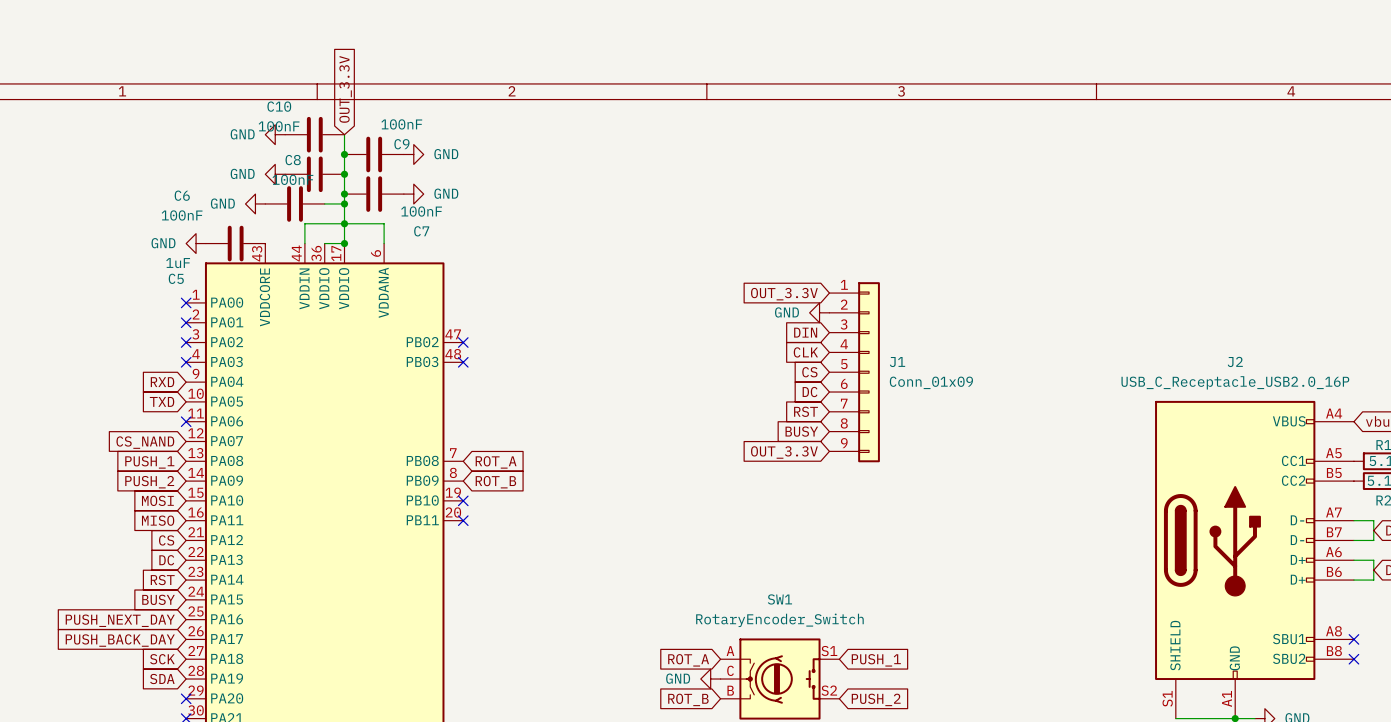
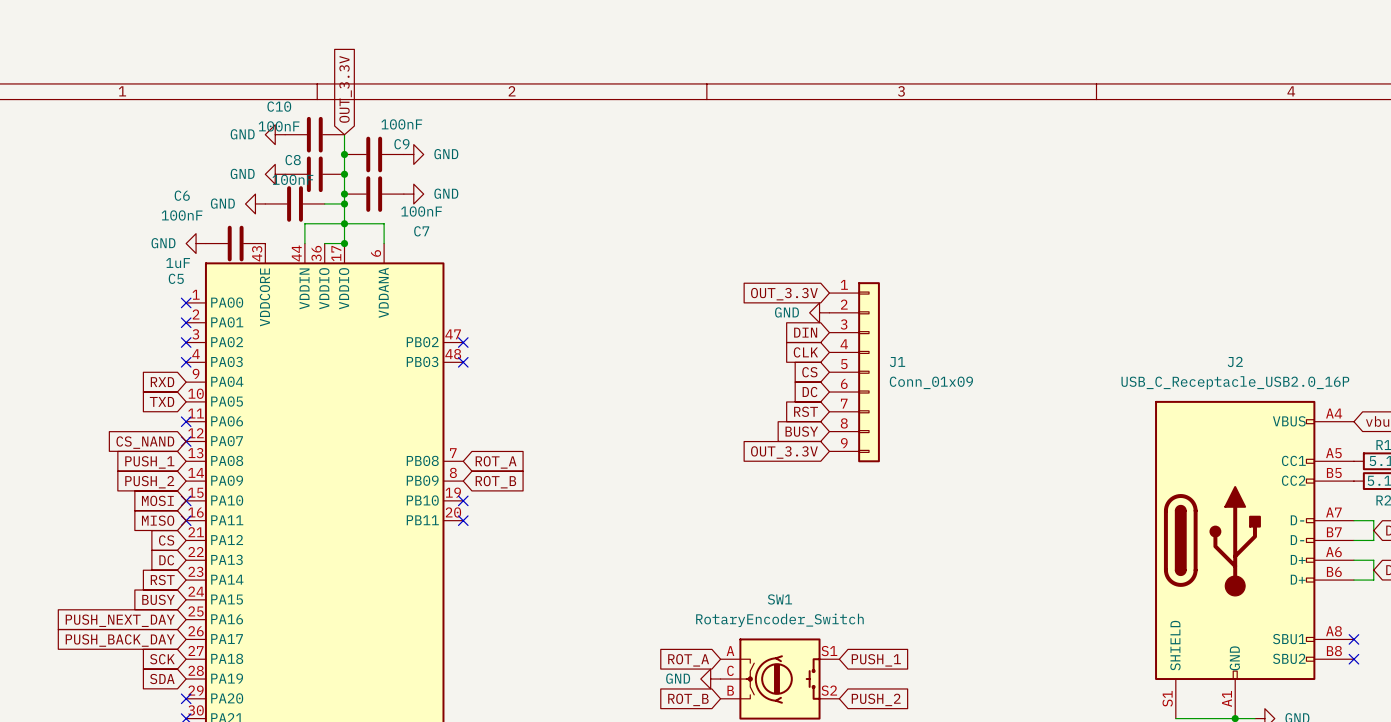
no-connect mark: none -> (186, 441)
no-connect mark: none -> (186, 500)
no-connect mark: none -> (186, 520)

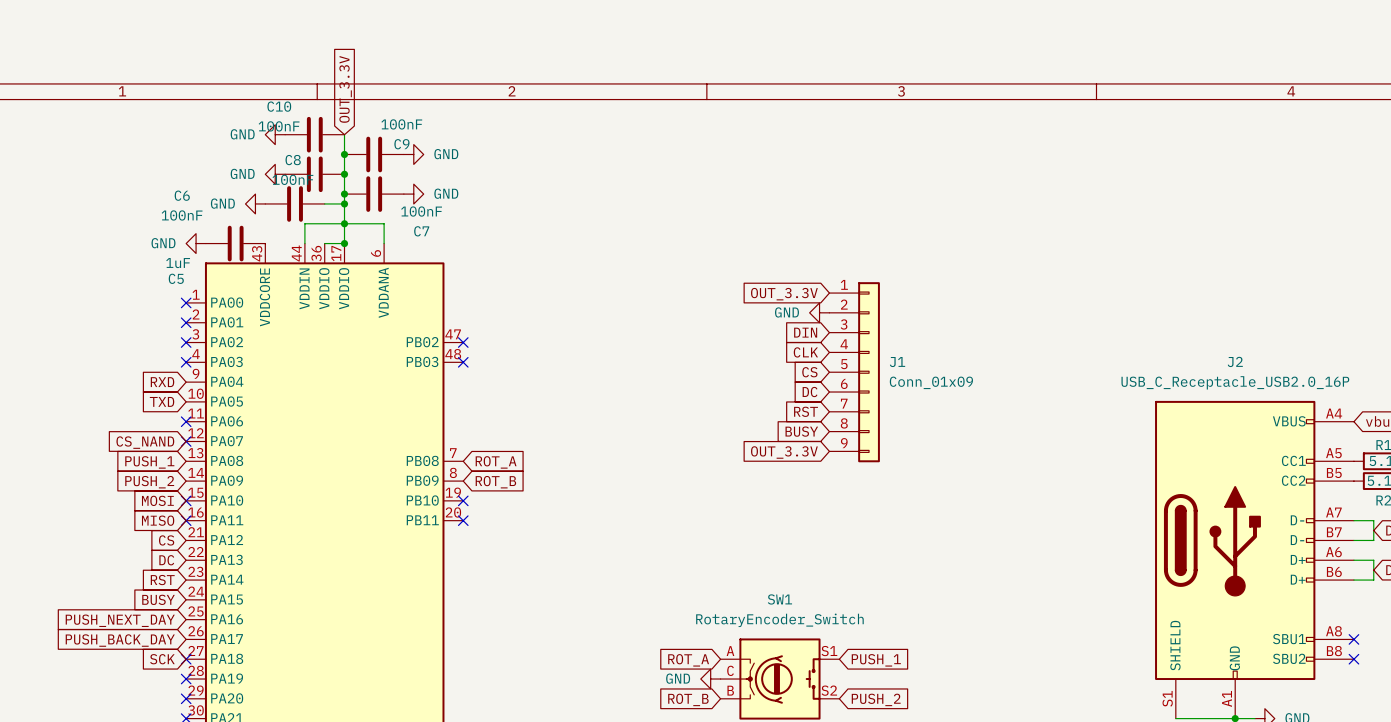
no-connect mark: none -> (186, 659)
global label: SDA (162, 679) -> none
no-connect mark: none -> (186, 679)

